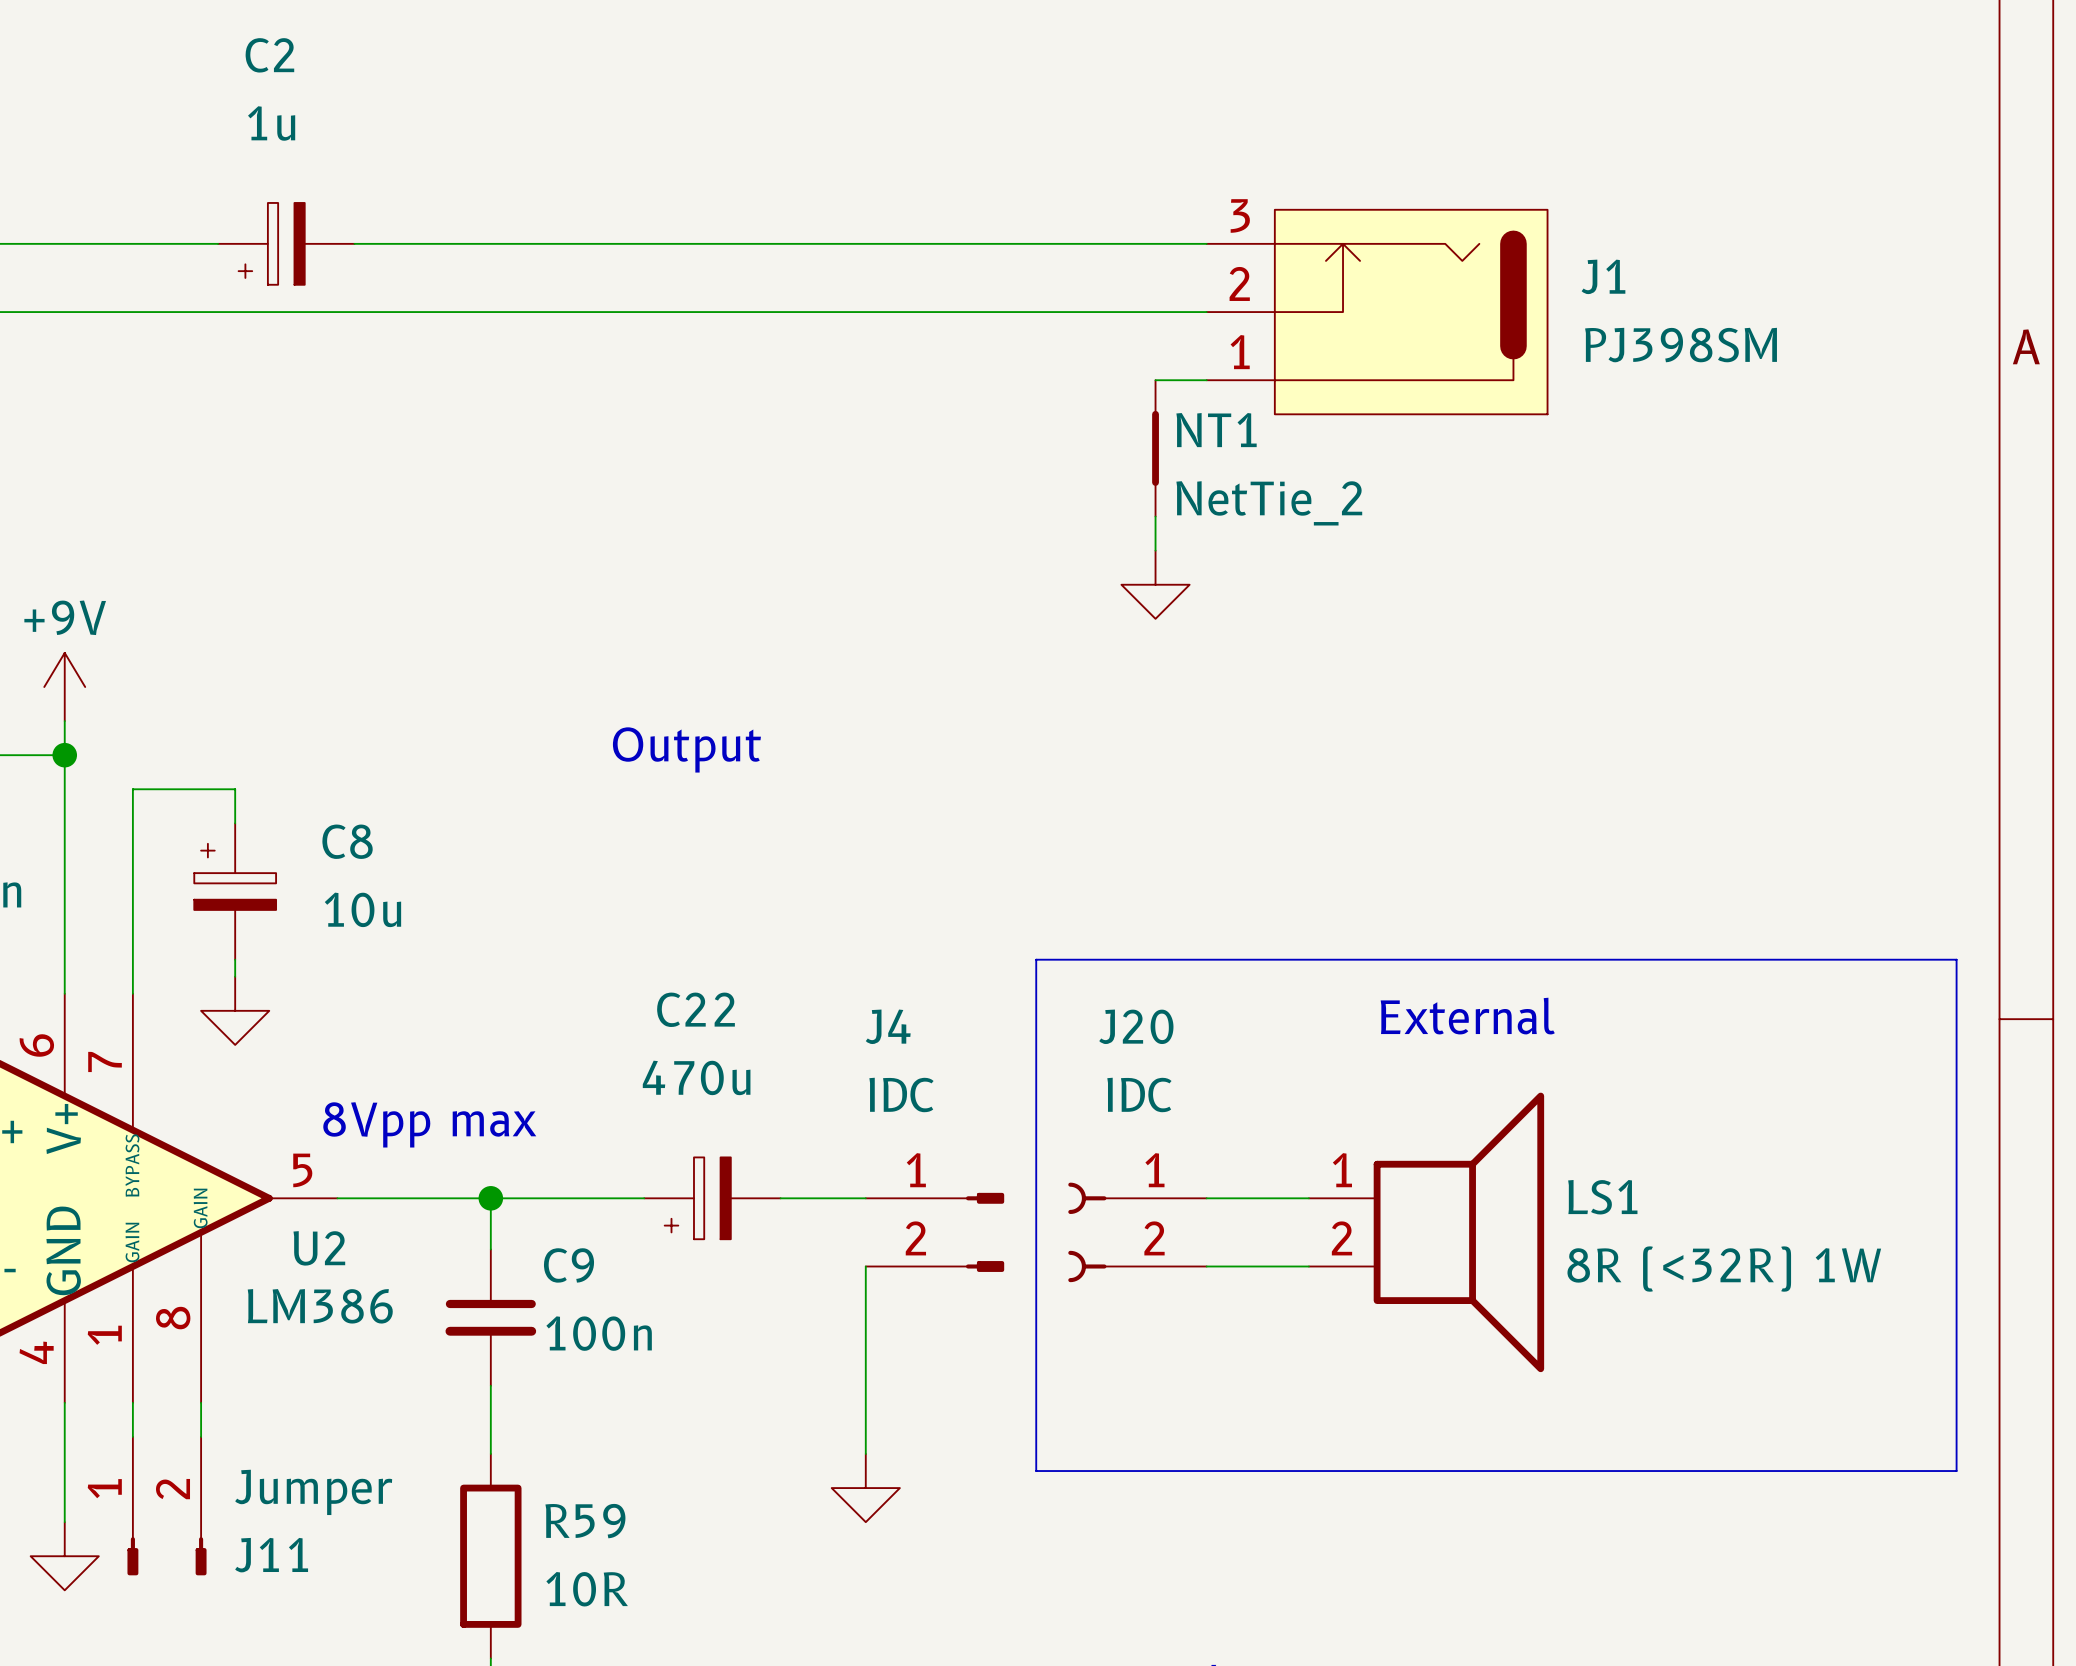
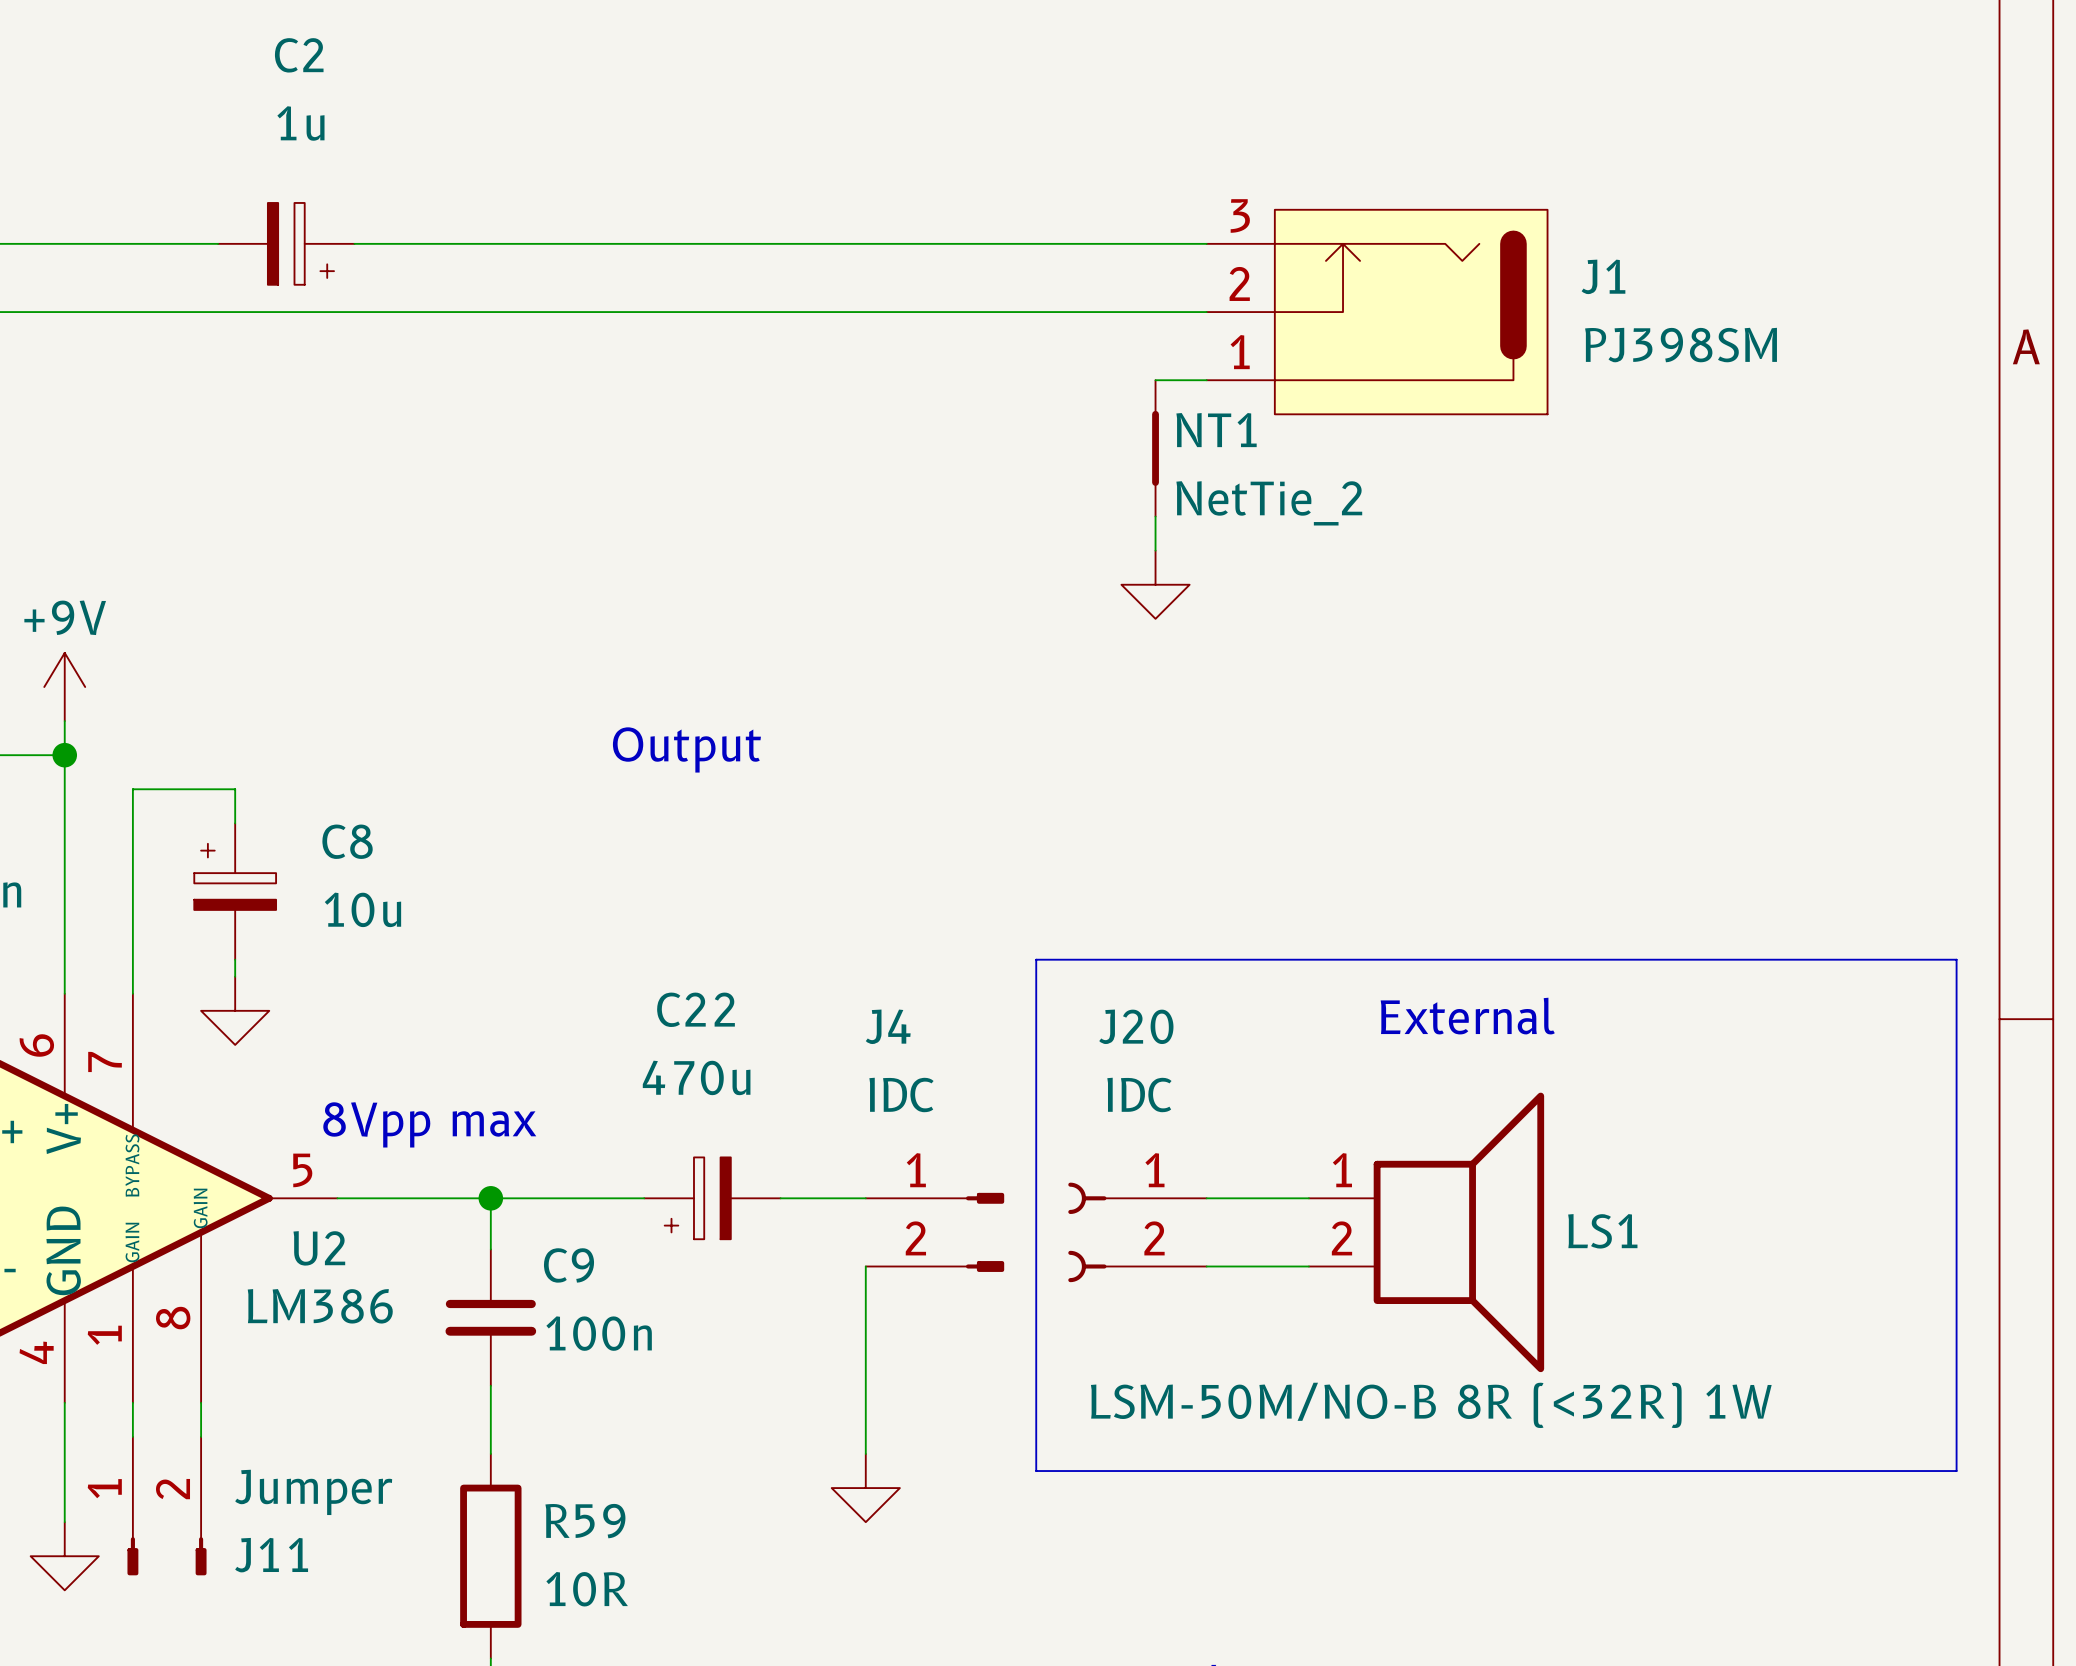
C2 flip: as is (271, 243) -> left-right (300, 243)
LS1 name position: LS1 (1602, 1197) -> LS1 (1602, 1231)
LS1 value: 8R (<32R) 1W (1724, 1269) -> LSM-50M/NO-B 8R (<32R) 1W (1431, 1405)

